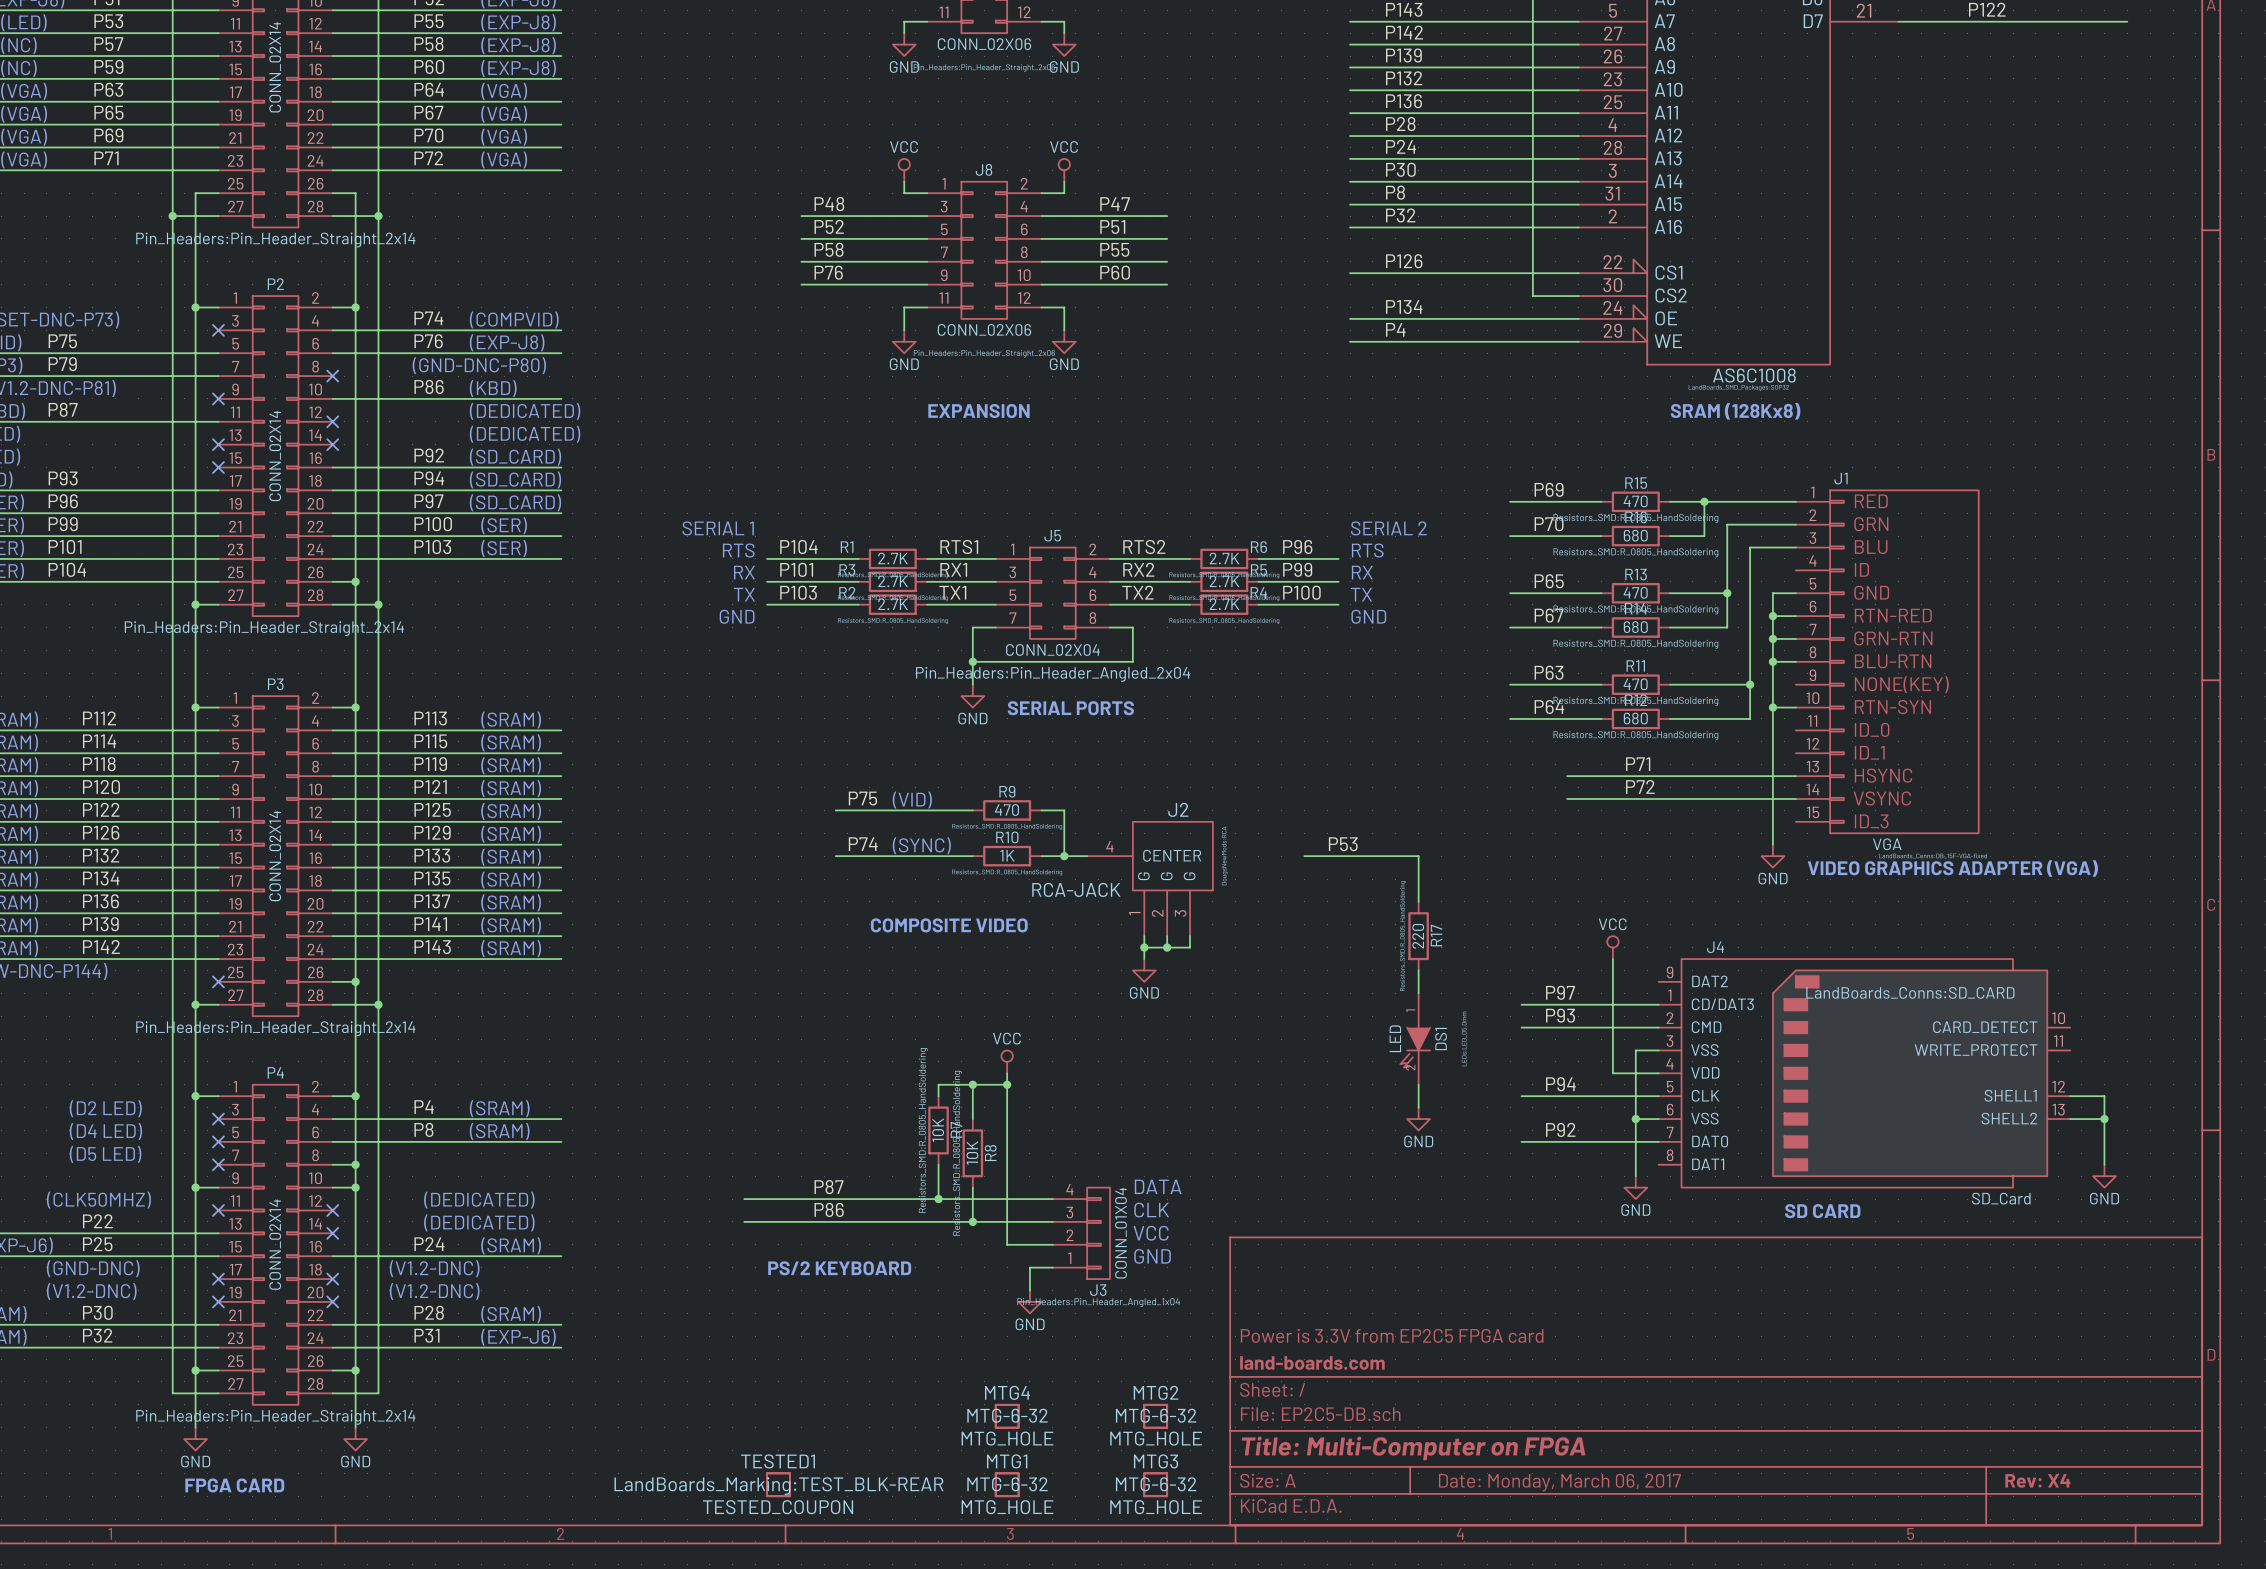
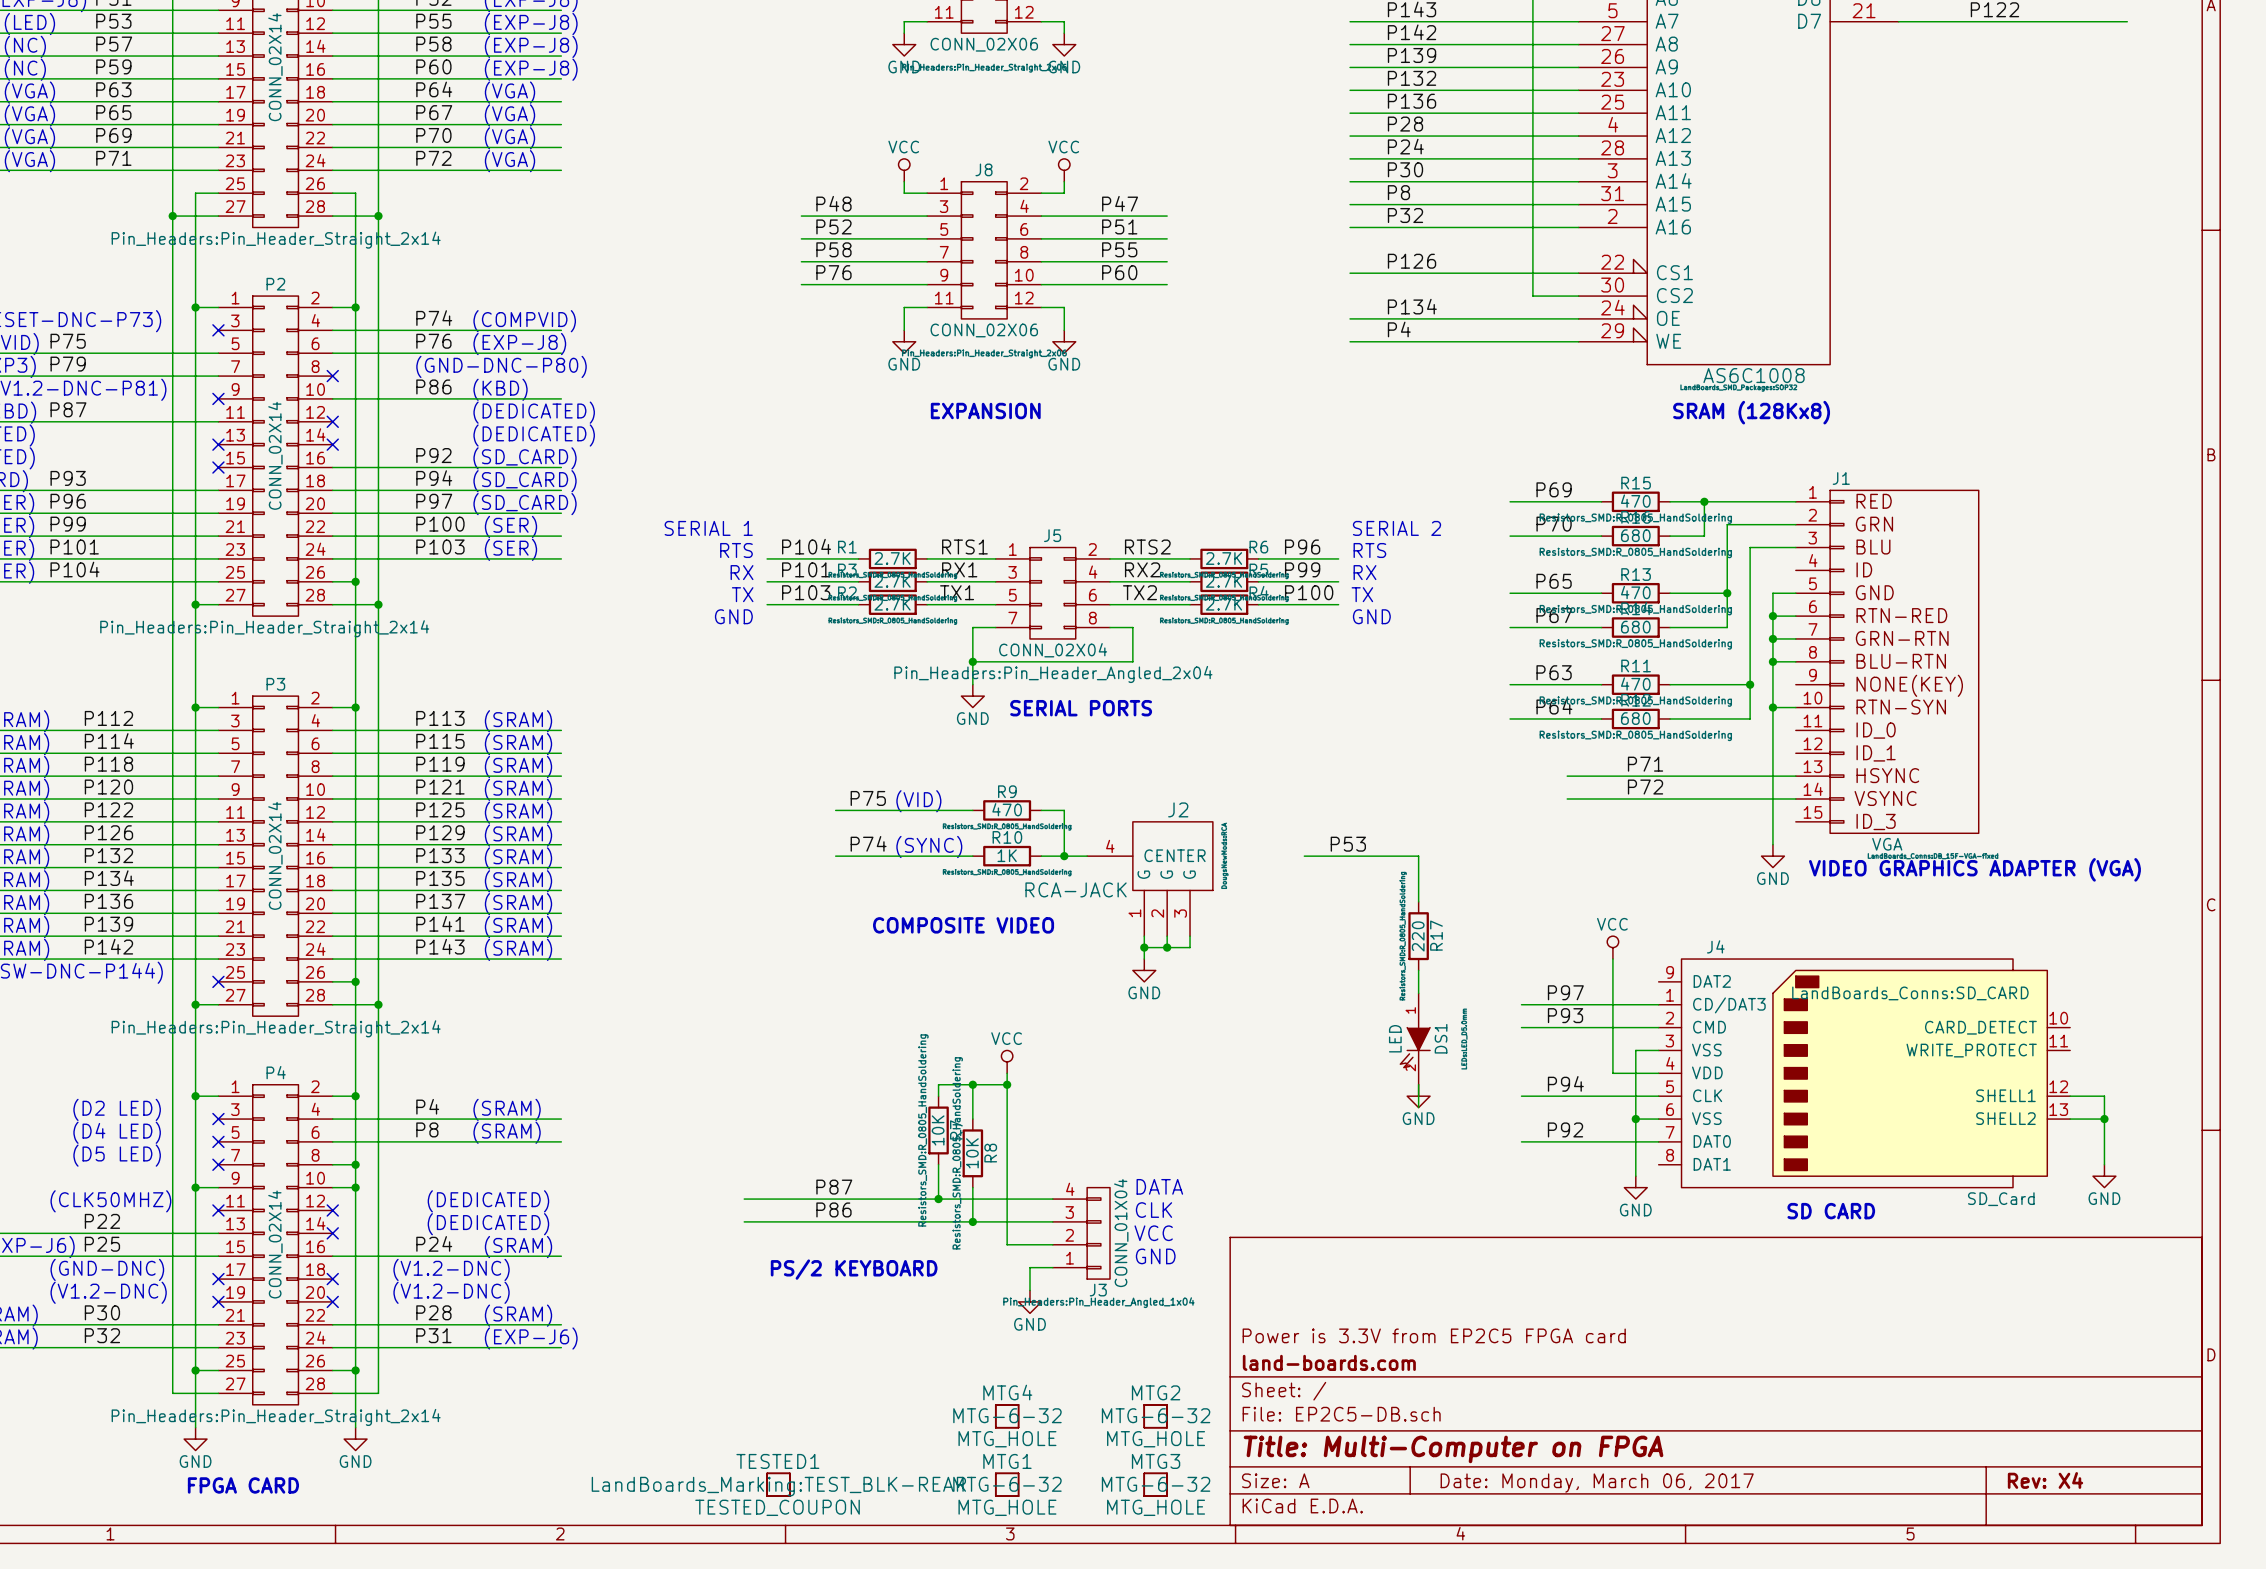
power symbol position: GND (1418, 1119) -> GND (1418, 1096)

